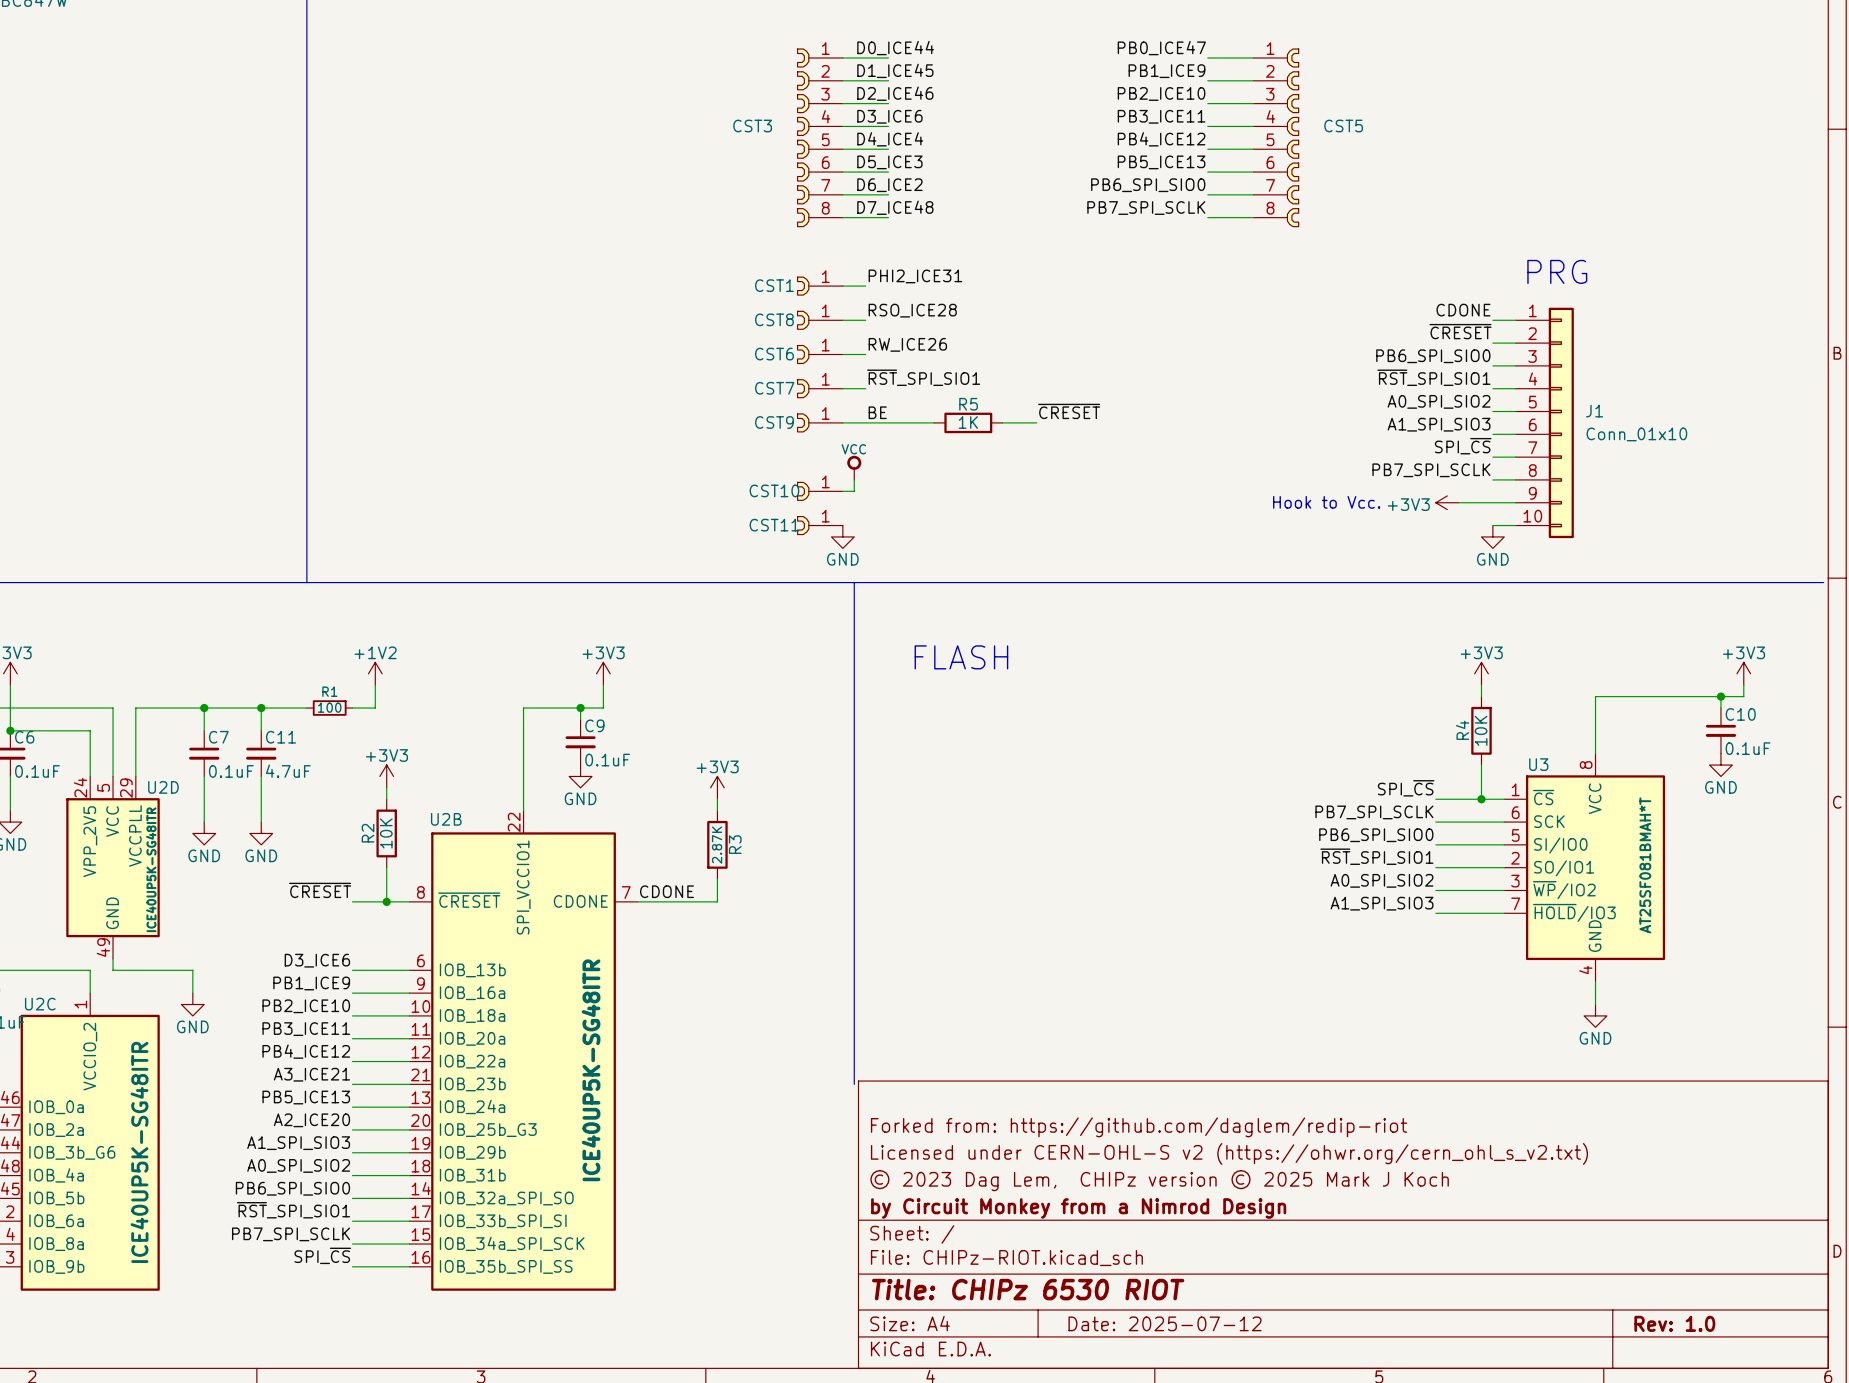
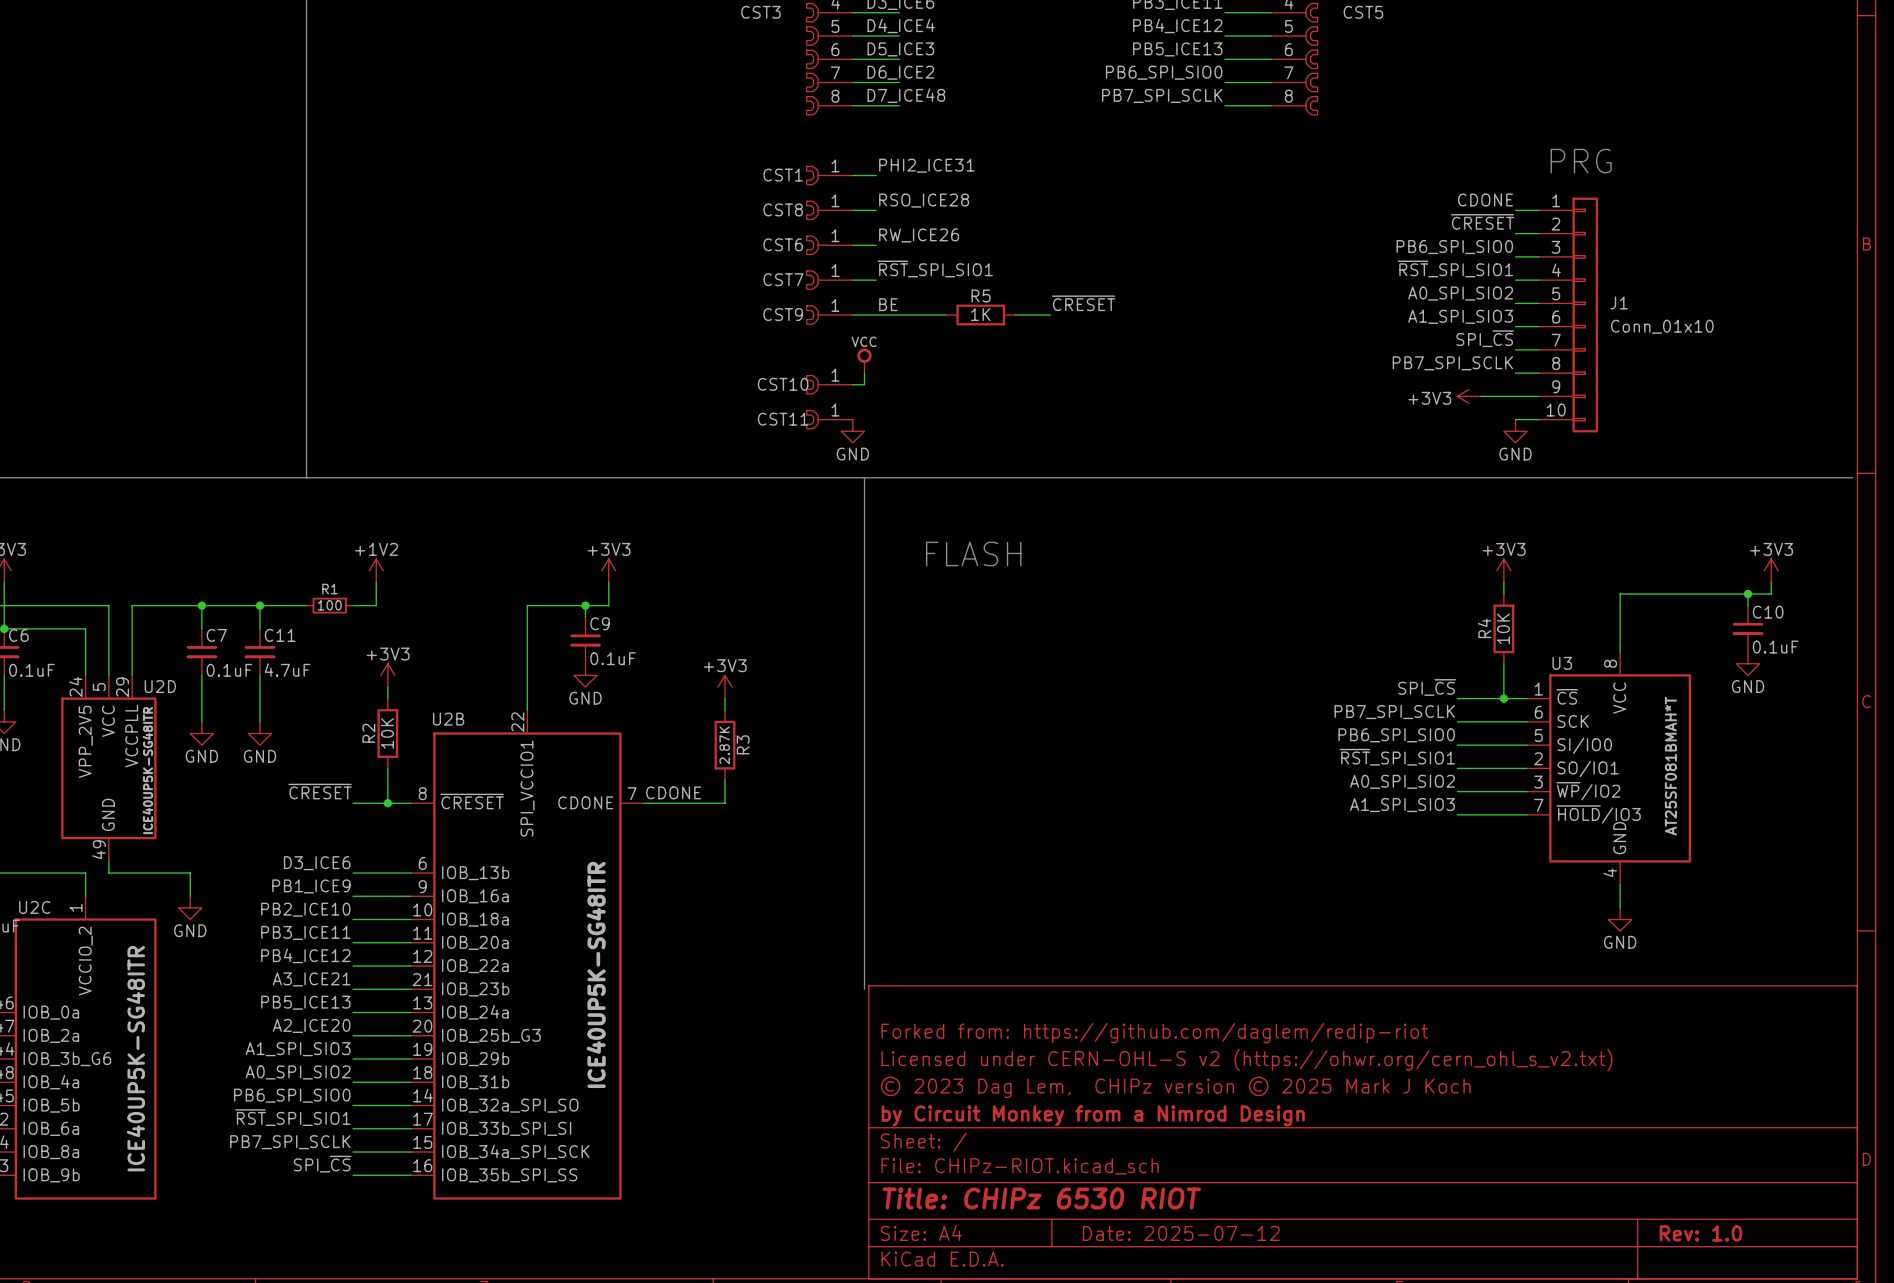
text: Hook to Vcc. (1326, 502) -> none

